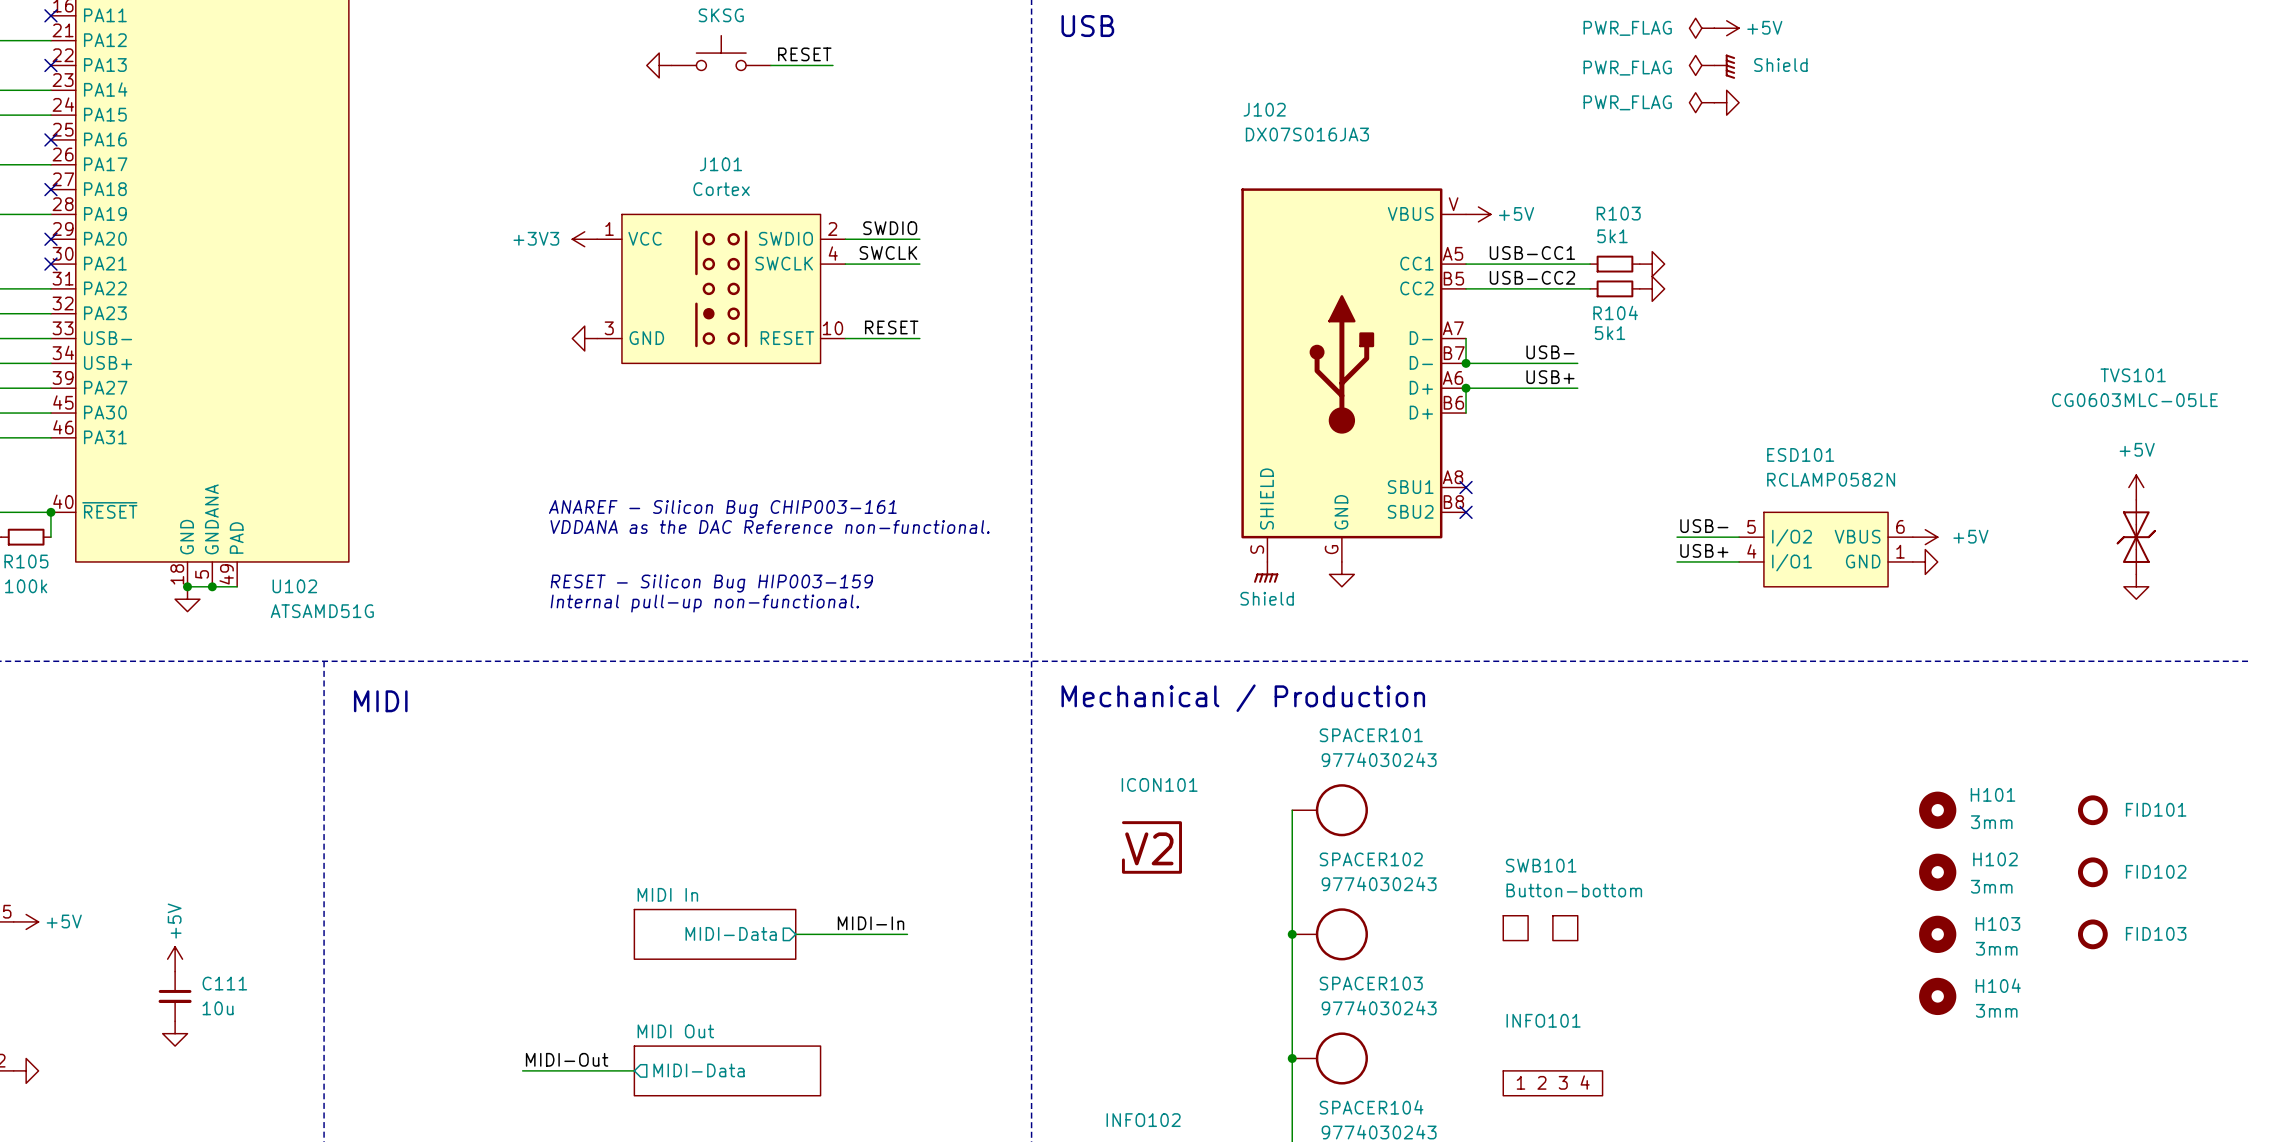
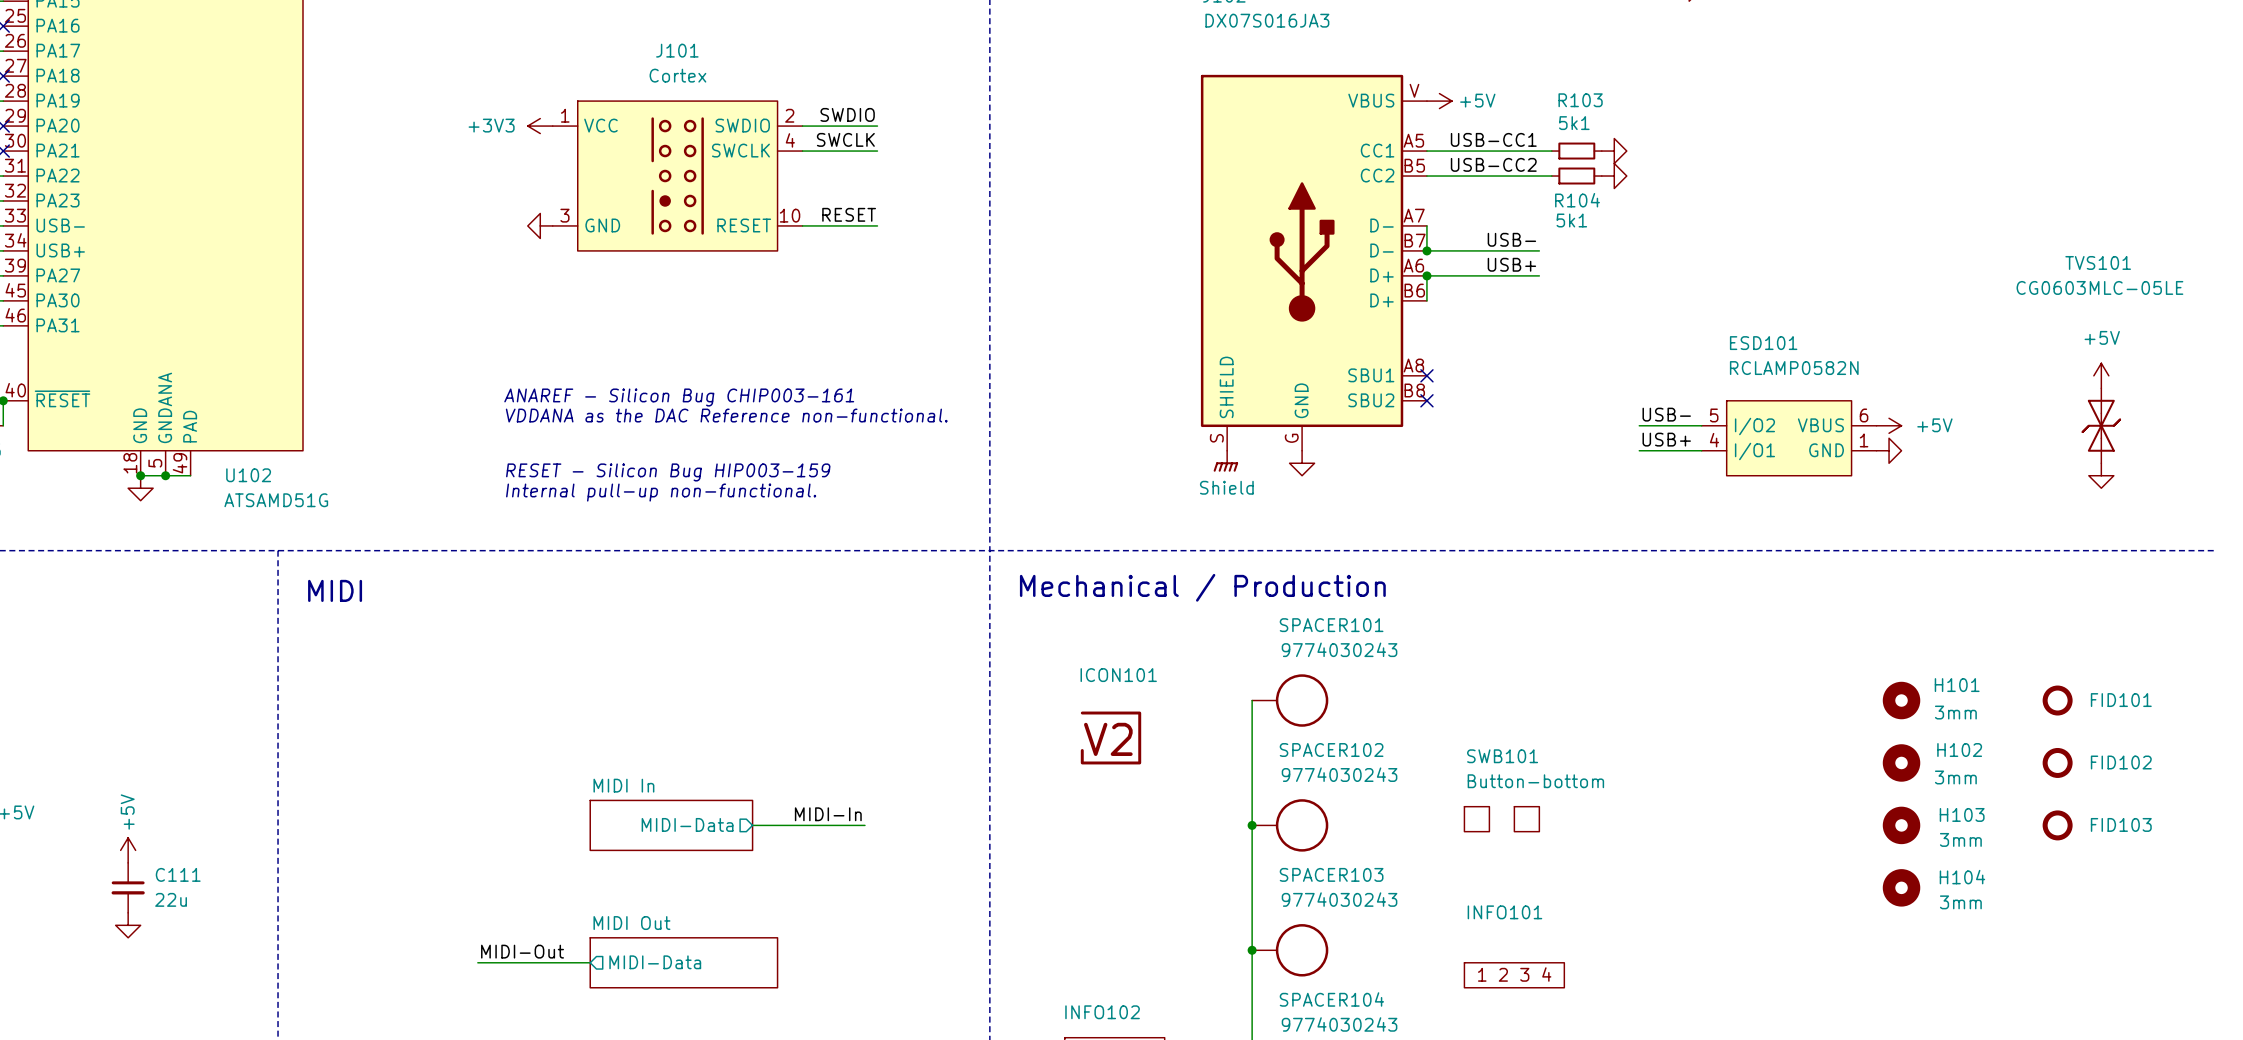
C111 value: 10u (218, 1008) -> 22u (171, 899)

